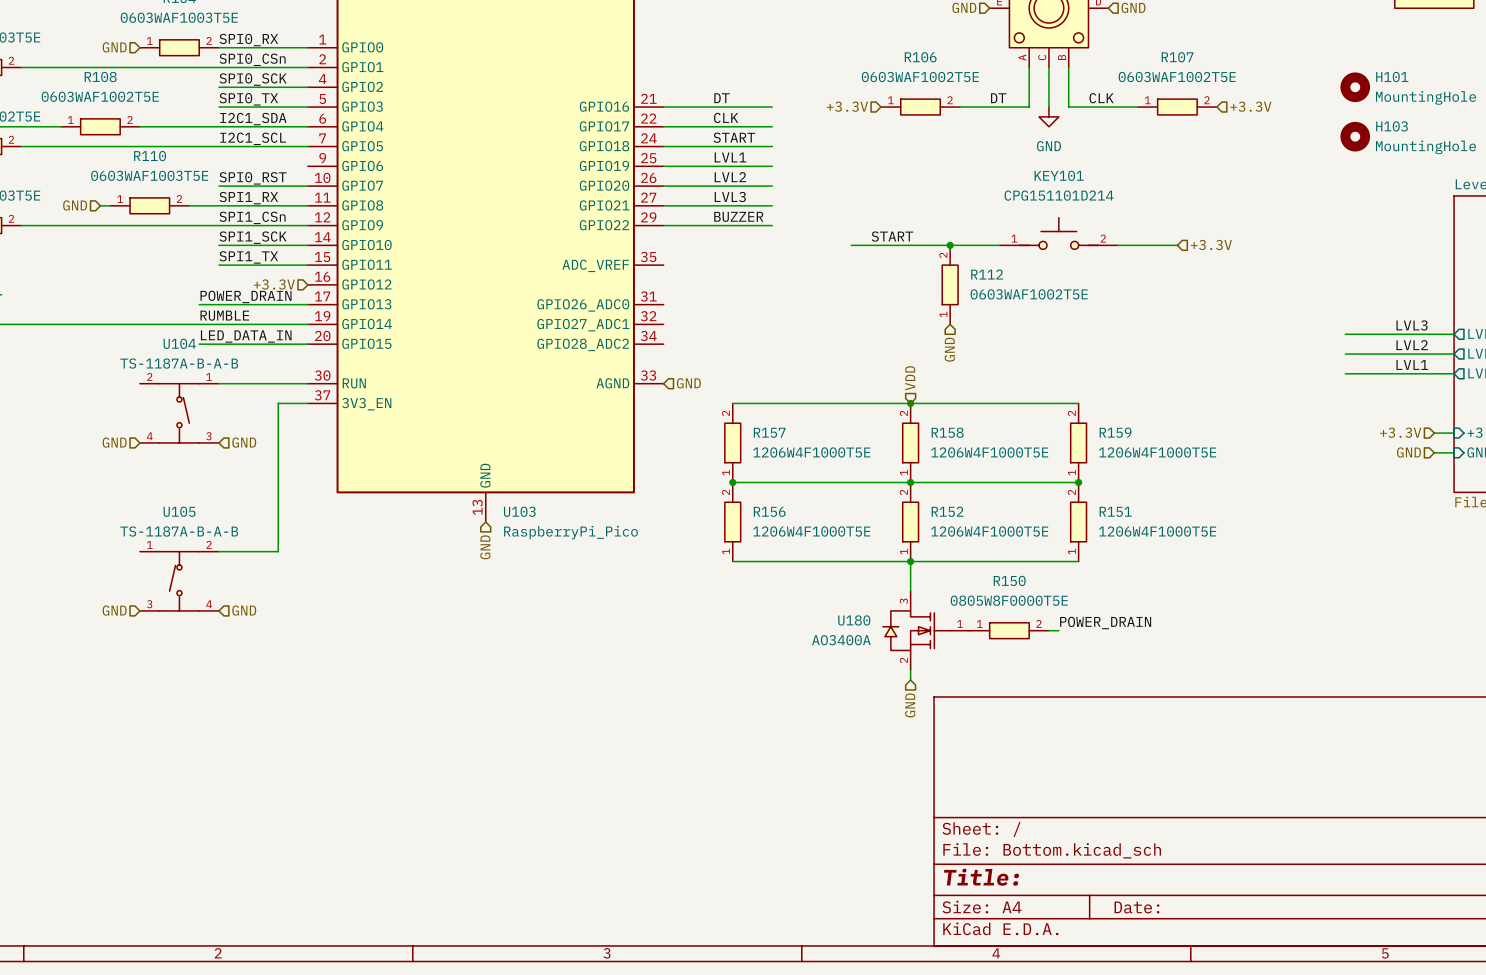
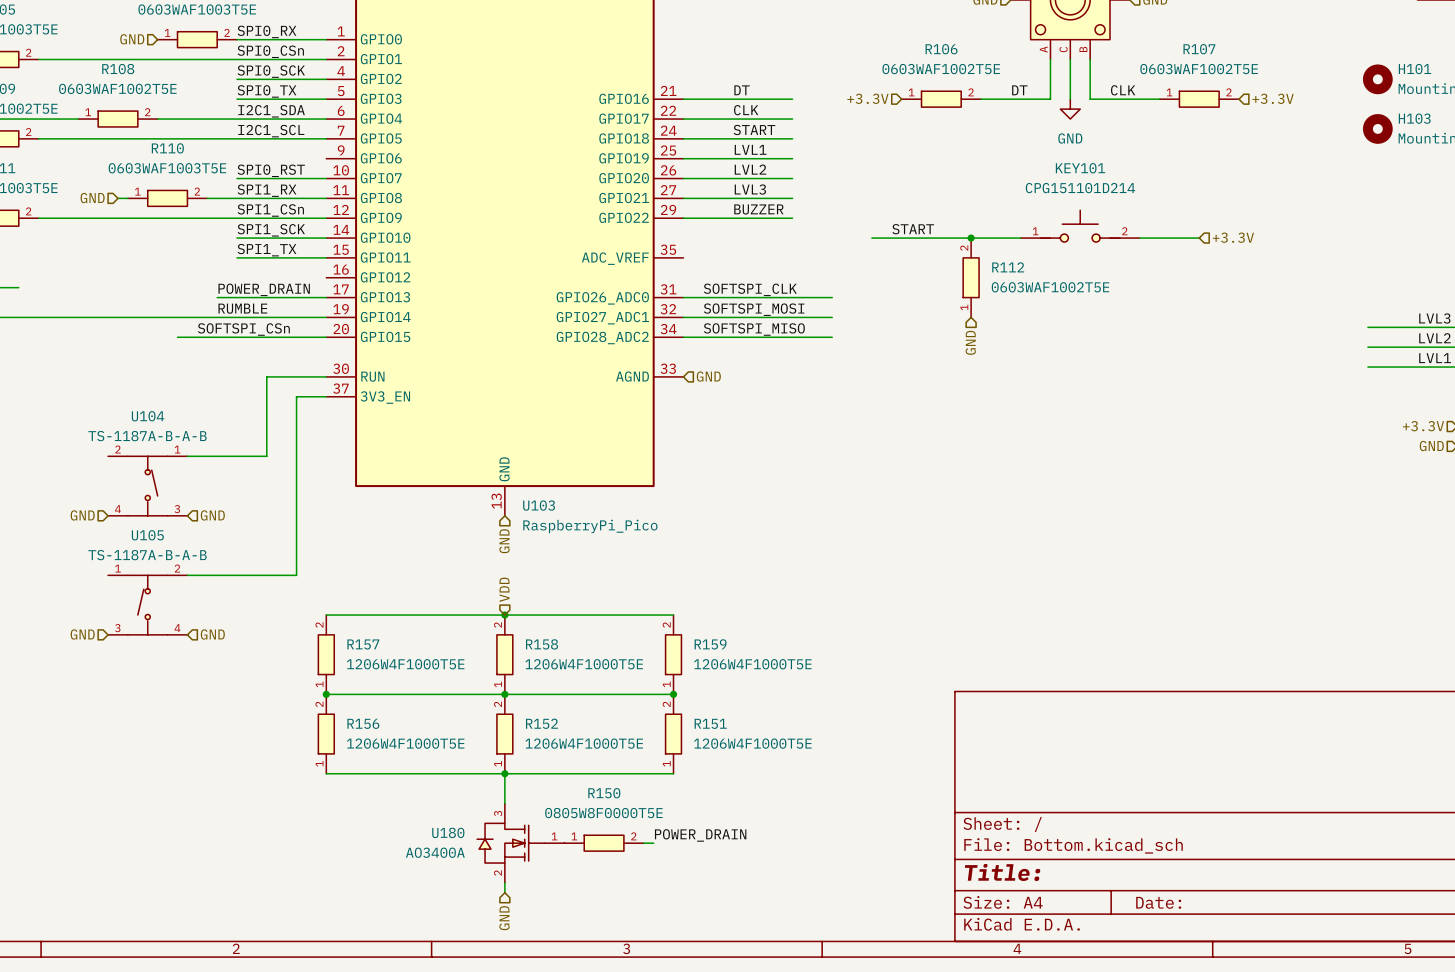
hierarchical label: +3.3V (274, 284) -> none
label: none -> SOFTSPI_CLK (750, 289)
wire: none -> (683, 297) (832, 297)
label: none -> SOFTSPI_MOSI (754, 309)
wire: none -> (683, 317) (832, 317)
label: none -> SOFTSPI_CSn (243, 329)
label: LED_DATA_IN (246, 336) -> none
label: none -> SOFTSPI_MISO (754, 329)
wire: none -> (177, 337) (217, 337)
wire: none -> (683, 337) (832, 337)
hierarchical label: VDD (910, 378) -> none
wire: (218, 383) (248, 383) -> (187, 456) (266, 456) (266, 376)
wire: (732, 403) (1078, 403) -> none
junction: (910, 403) -> none
U104 position: (179, 413) -> (147, 486)
hierarchical label: GND (114, 442) -> none
hierarchical label: GND (244, 442) -> none
R157 position: (732, 442) -> (326, 654)
R158 position: (910, 442) -> (504, 654)
R159 position: (1078, 442) -> (673, 654)
wire: (732, 482) (1078, 482) -> none
junction: (732, 482) -> none
junction: (910, 482) -> none
junction: (1078, 482) -> none
hierarchical label: none -> GND (82, 515)
hierarchical label: none -> GND (212, 515)
R156 position: (732, 522) -> (326, 734)
R152 position: (910, 522) -> (504, 734)
R151 position: (1078, 522) -> (673, 734)
wire: (218, 551) (278, 551) -> (187, 575) (296, 575) (296, 545)
wire: (732, 561) (1078, 561) -> none
wire: (910, 561) (910, 591) -> none
junction: (910, 561) -> none
U105 position: (179, 581) -> (147, 605)
hierarchical label: none -> VDD (504, 589)
hierarchical label: GND (114, 610) -> none
hierarchical label: GND (244, 610) -> none
wire: none -> (326, 615) (673, 615)
junction: none -> (504, 615)
label: POWER_DRAIN (1105, 622) -> none
U180 position: (926, 630) -> (520, 843)
R150 position: (1009, 630) -> (604, 843)
wire: (1048, 630) (1058, 630) -> none
hierarchical label: none -> GND (82, 634)
hierarchical label: none -> GND (212, 634)
wire: (910, 670) (910, 680) -> none
wire: none -> (326, 694) (673, 694)
junction: none -> (326, 694)
junction: none -> (504, 694)
junction: none -> (673, 694)
hierarchical label: GND (910, 705) -> none
wire: none -> (326, 773) (673, 773)
wire: none -> (504, 773) (504, 803)
junction: none -> (504, 773)
label: none -> POWER_DRAIN (700, 835)
wire: none -> (643, 843) (653, 843)
wire: none -> (504, 882) (504, 892)
hierarchical label: none -> GND (504, 918)

